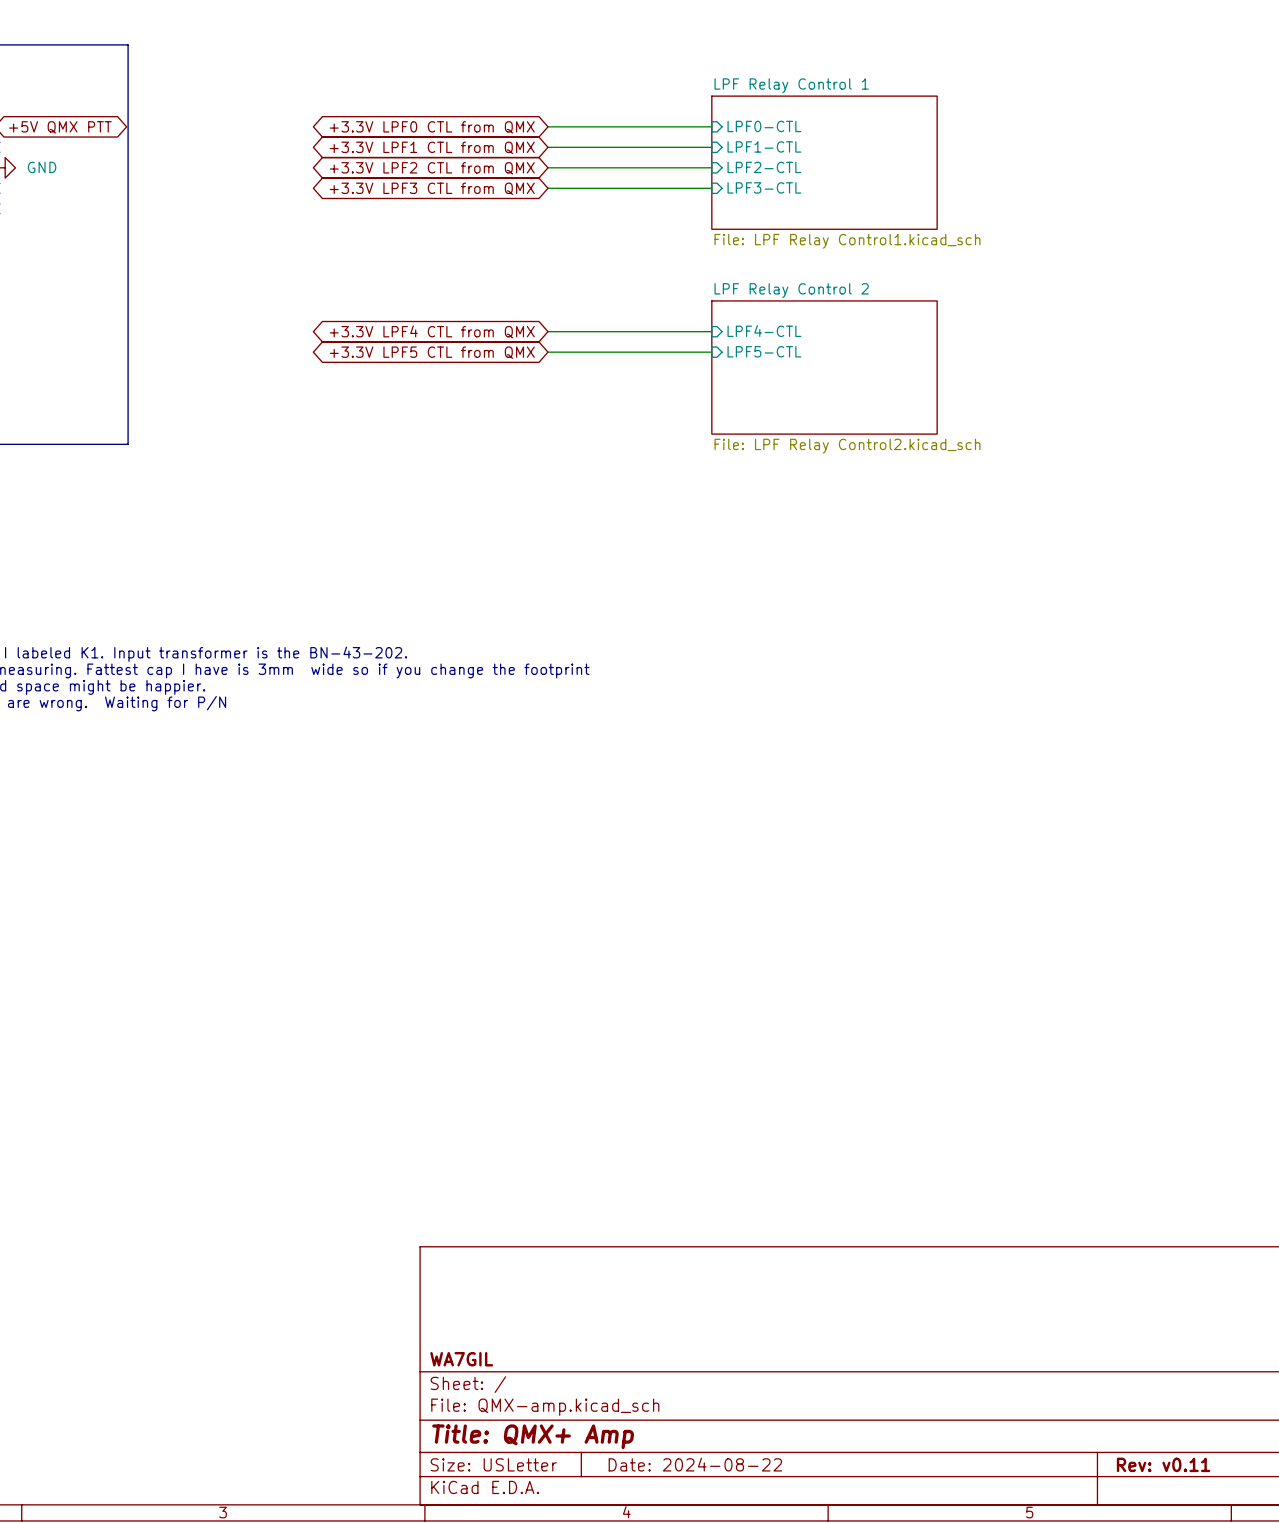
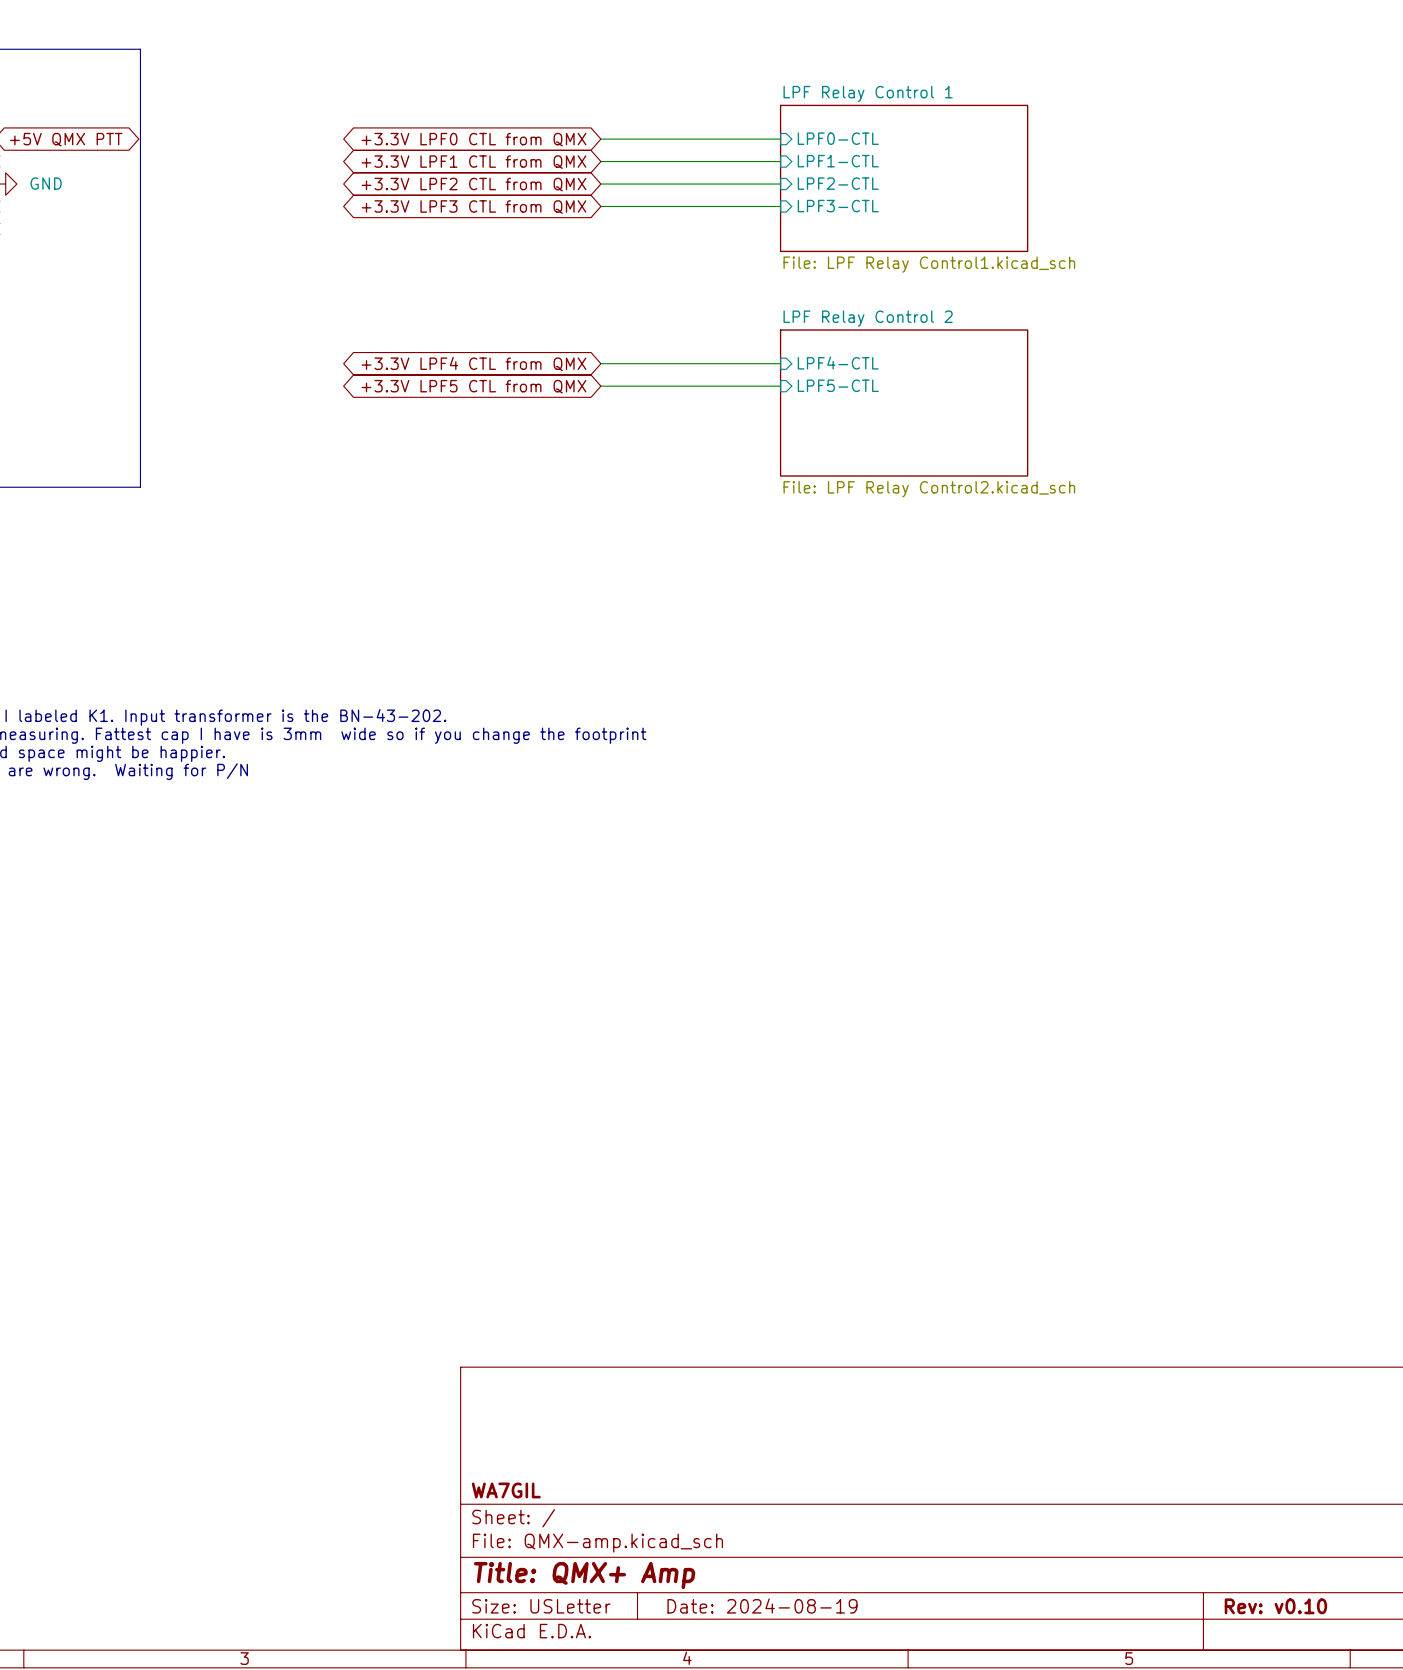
title block: Date: 2024-08-22 (695, 1464) -> Date: 2024-08-19 (762, 1606)
title block: Rev: v0.11 (1163, 1464) -> Rev: v0.10 (1275, 1606)

